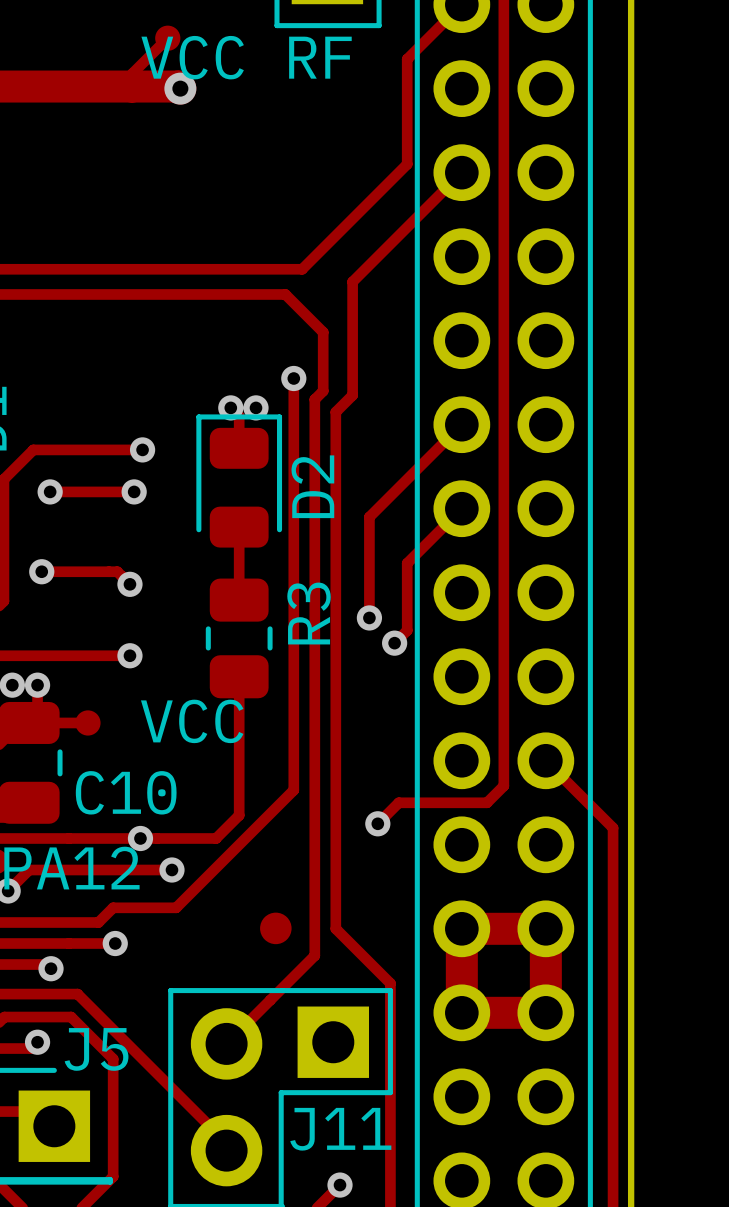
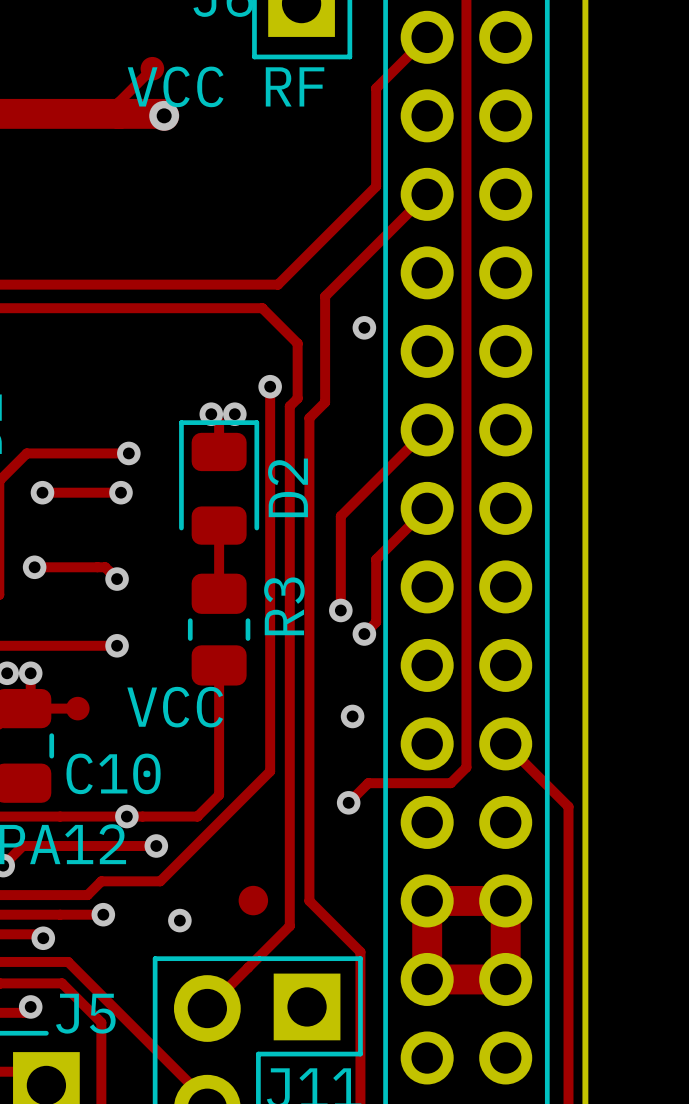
via: none -> (364, 327)
via: none -> (352, 716)
via: none -> (179, 920)

